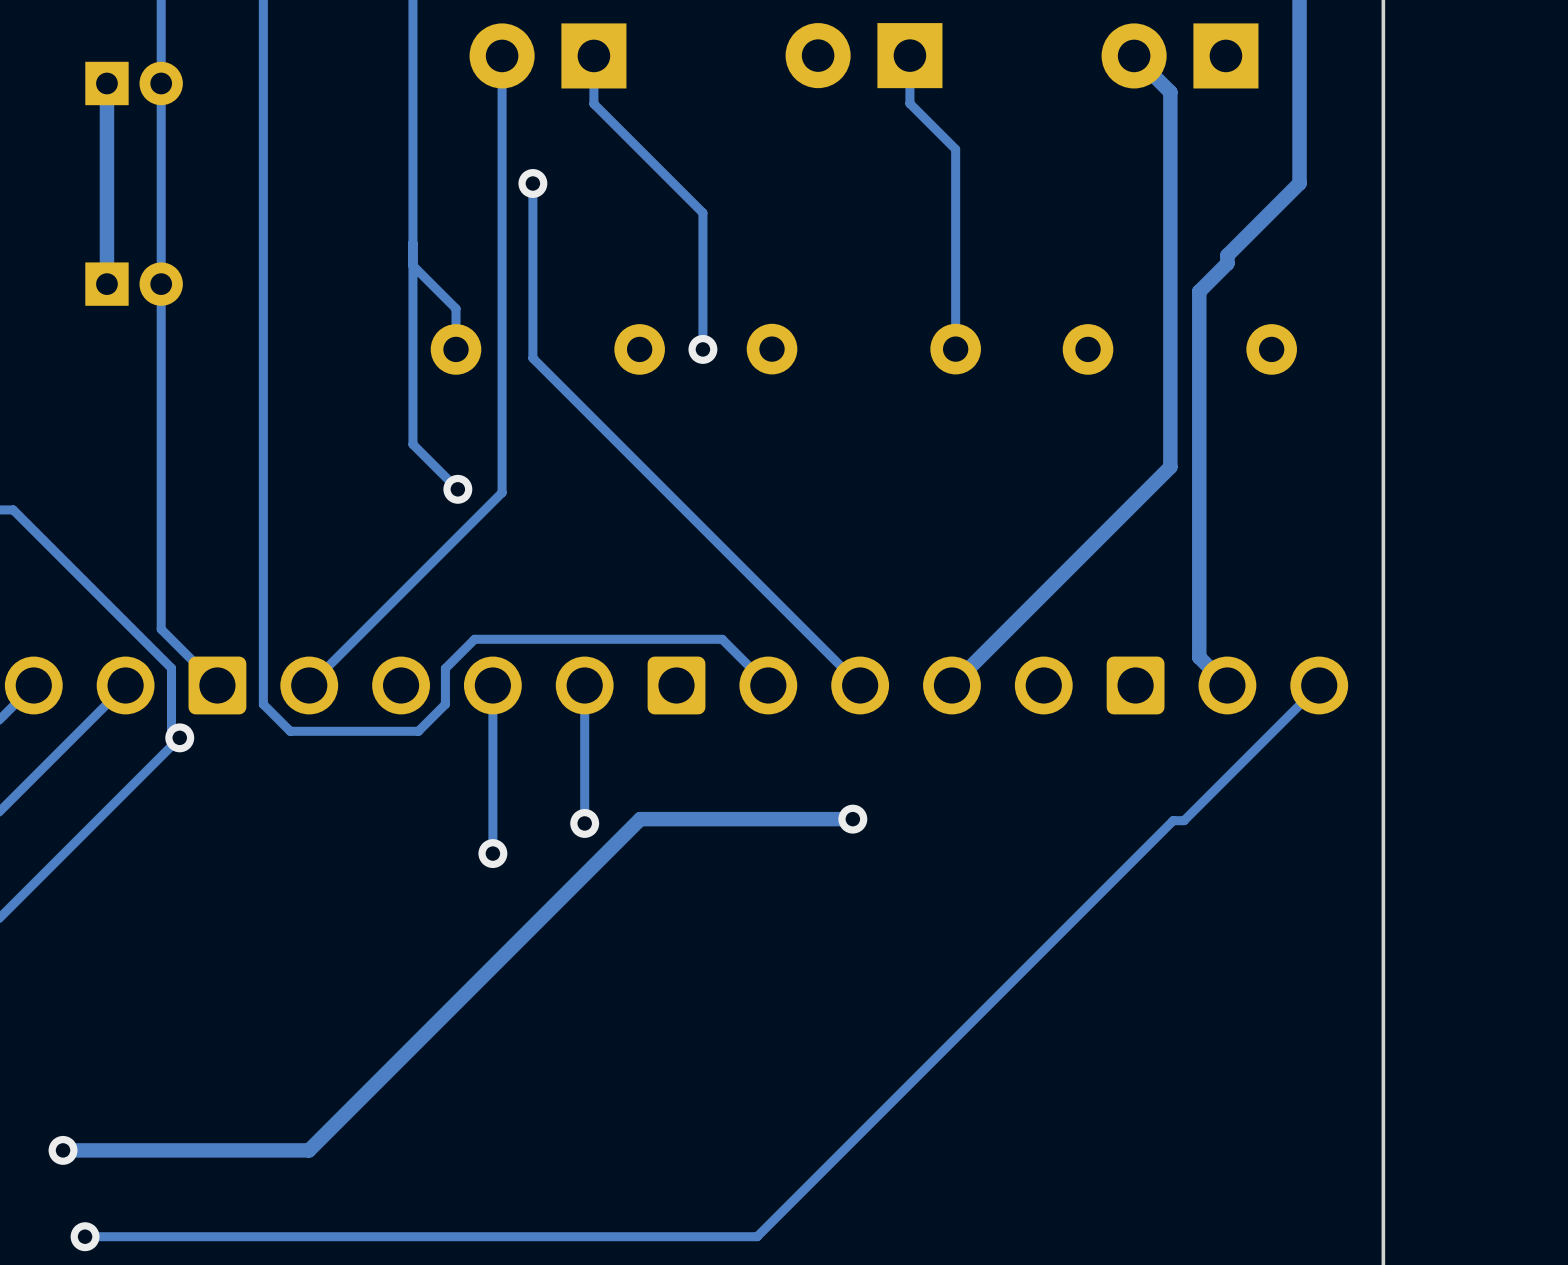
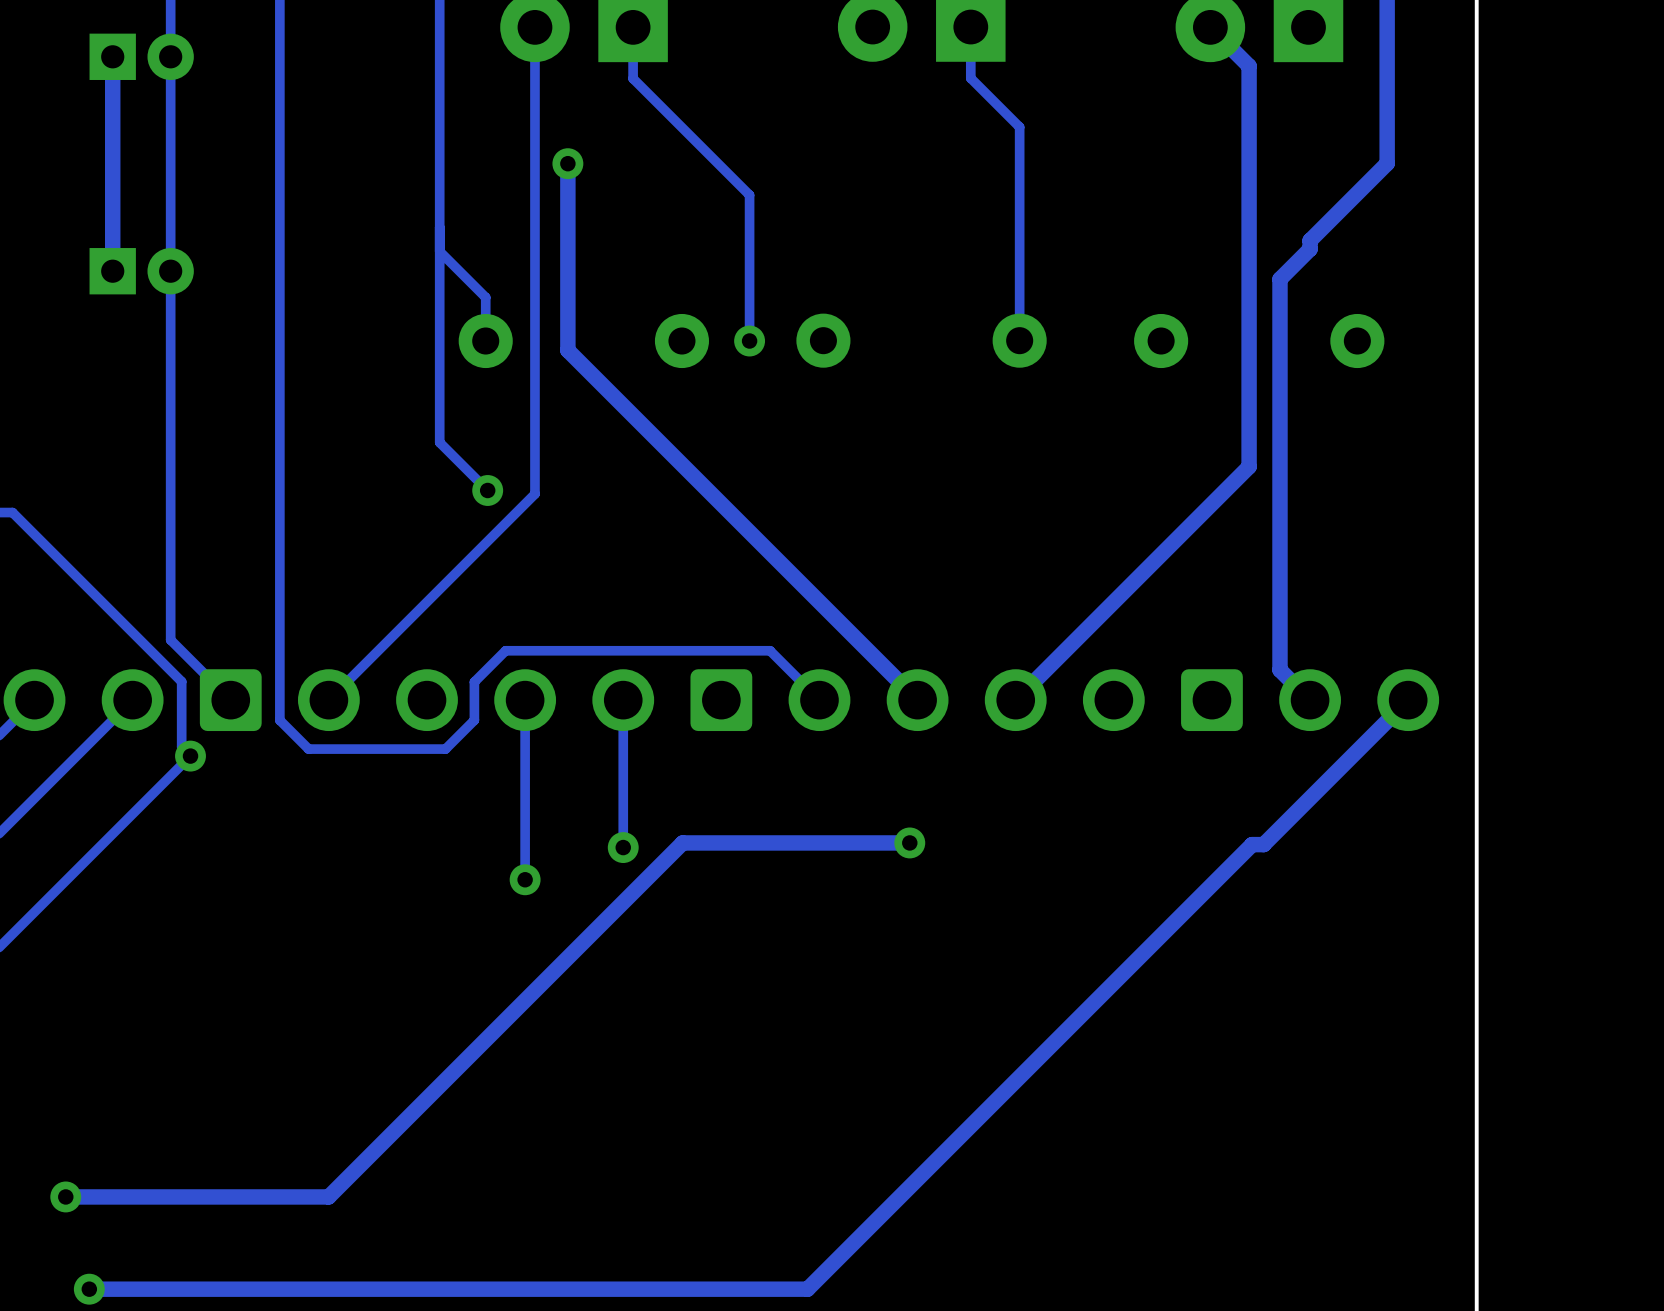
track width: thin (532, 183) (532, 358) (860, 685) -> thick (567, 163) (567, 350) (917, 700)
track width: thin (1319, 685) (1184, 820) (1173, 820) (757, 1236) (85, 1236) -> thick (1408, 700) (1263, 844) (1252, 844) (807, 1289) (89, 1289)

